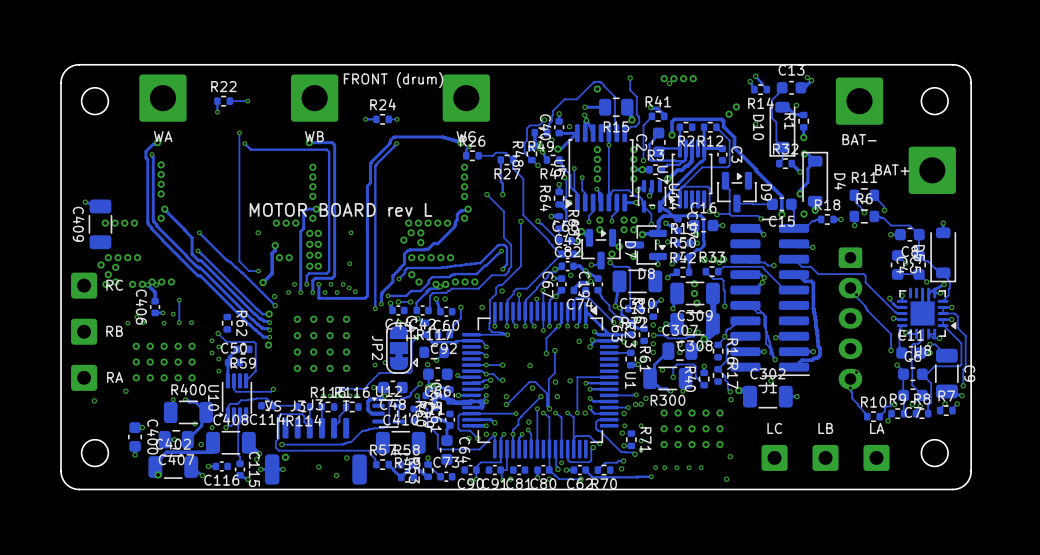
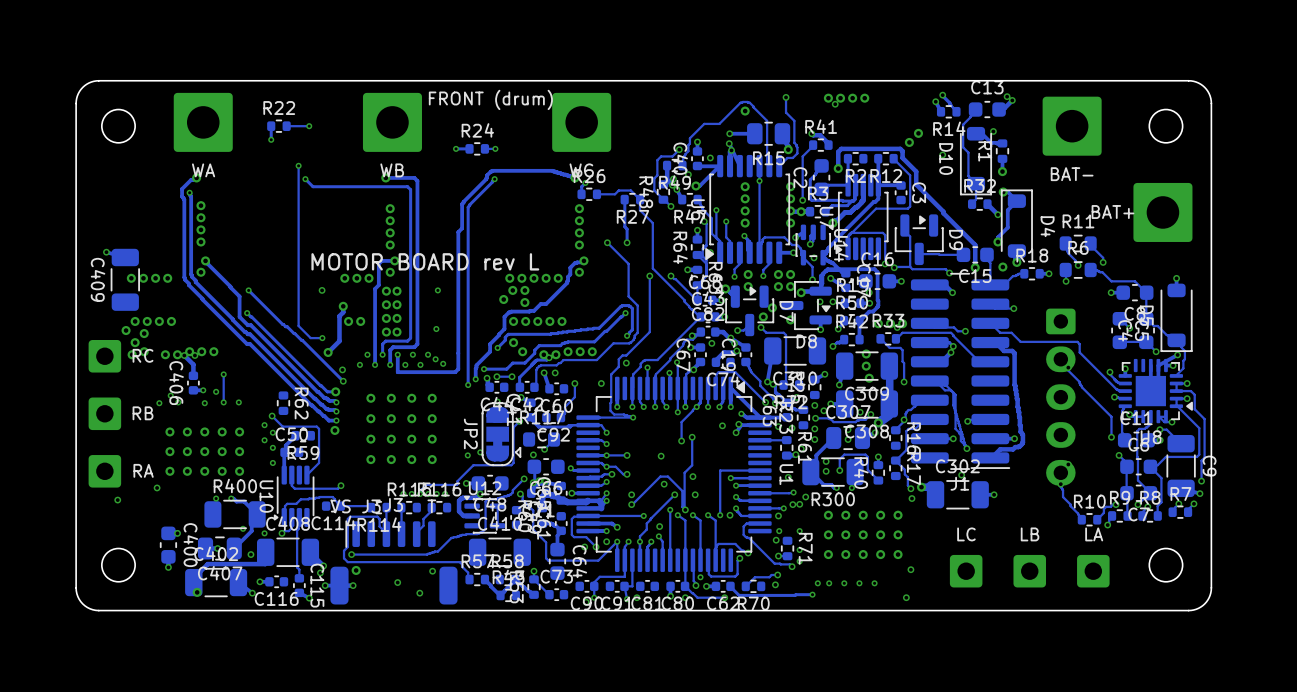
via: none -> (826, 471)
via: (570, 380) -> none
via: none -> (788, 477)

